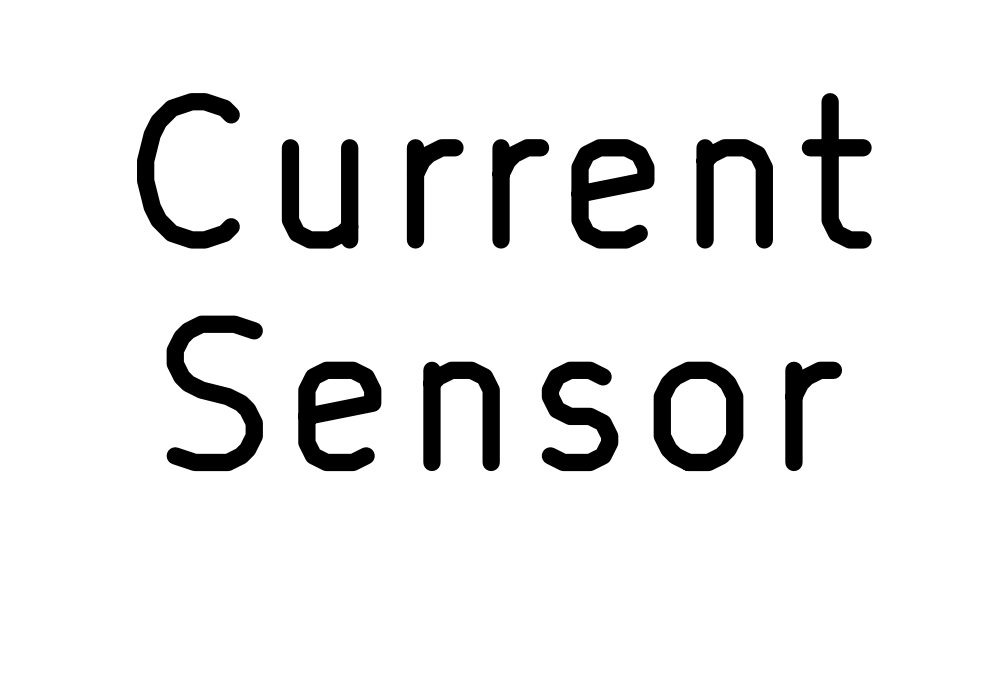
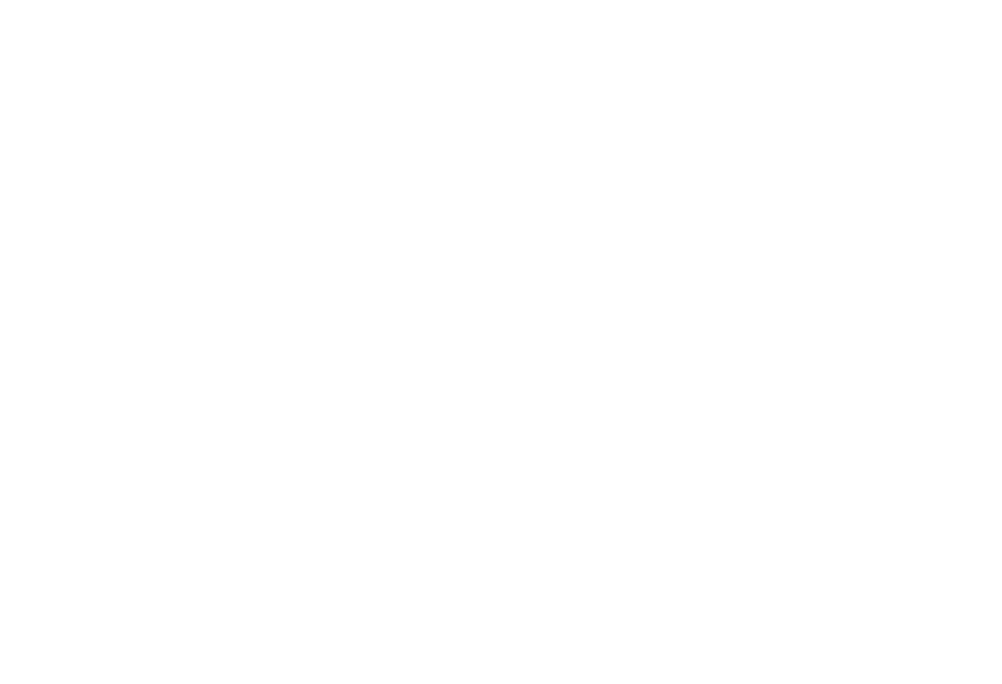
text: Current (504, 170) -> none
text: Sensor (504, 393) -> none

